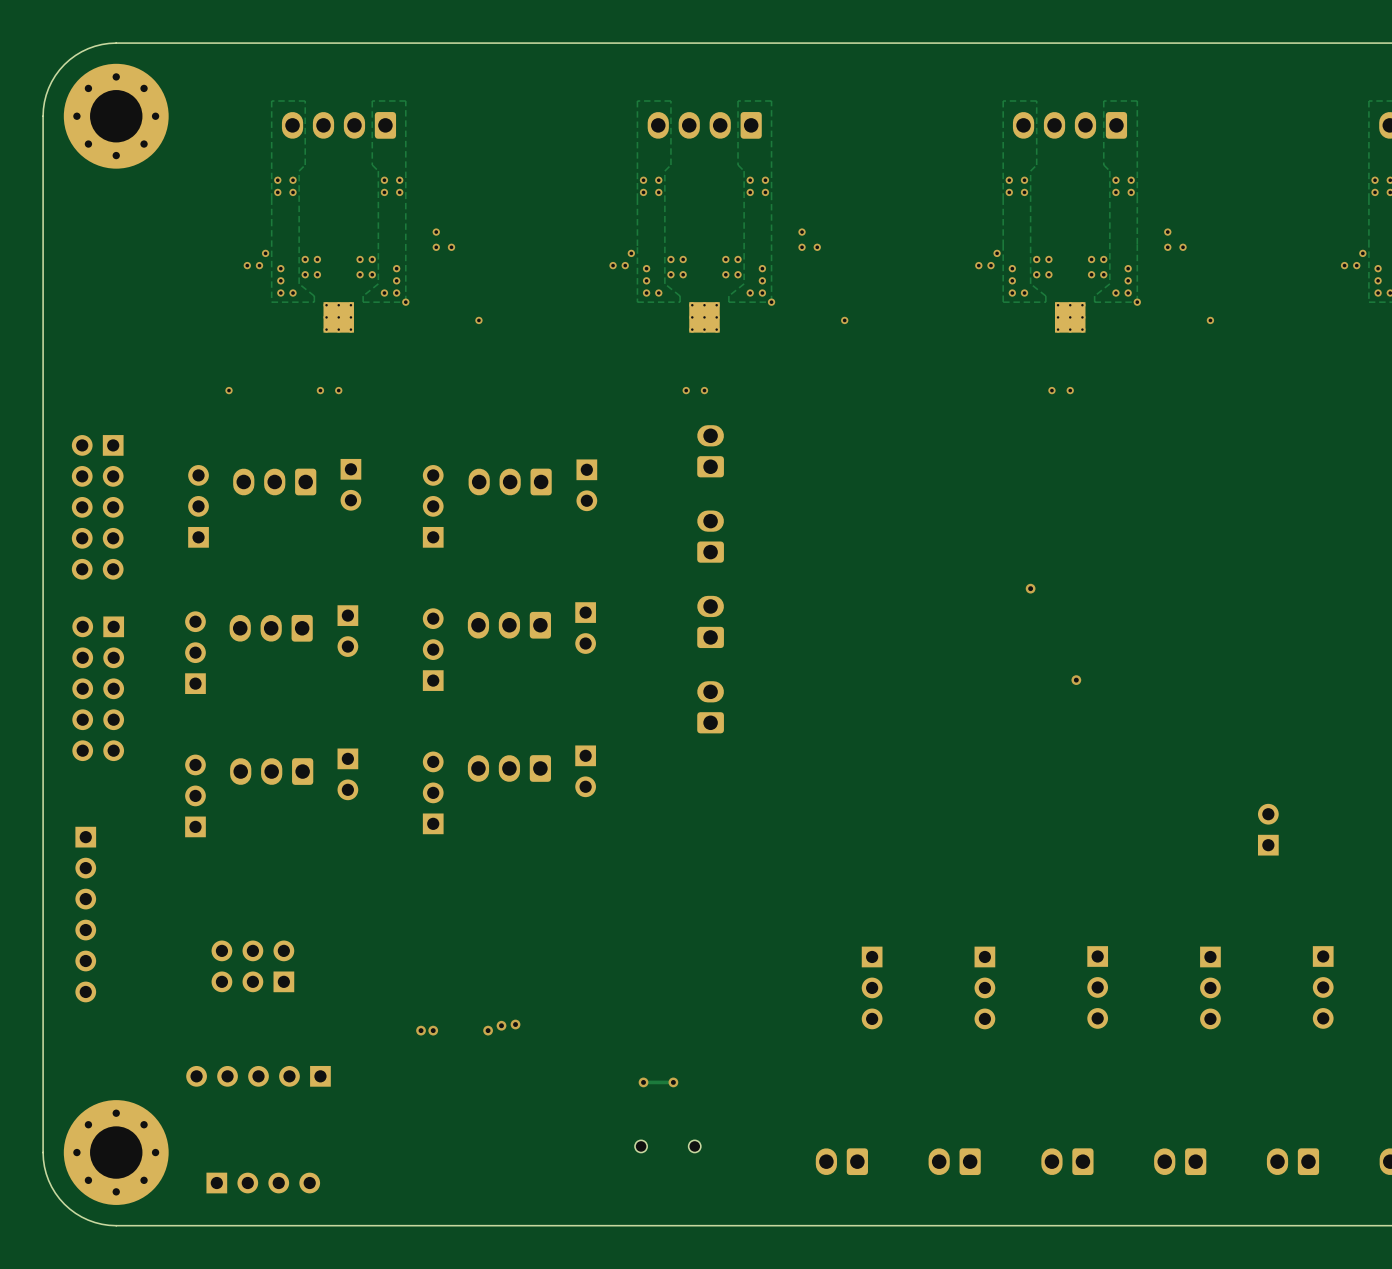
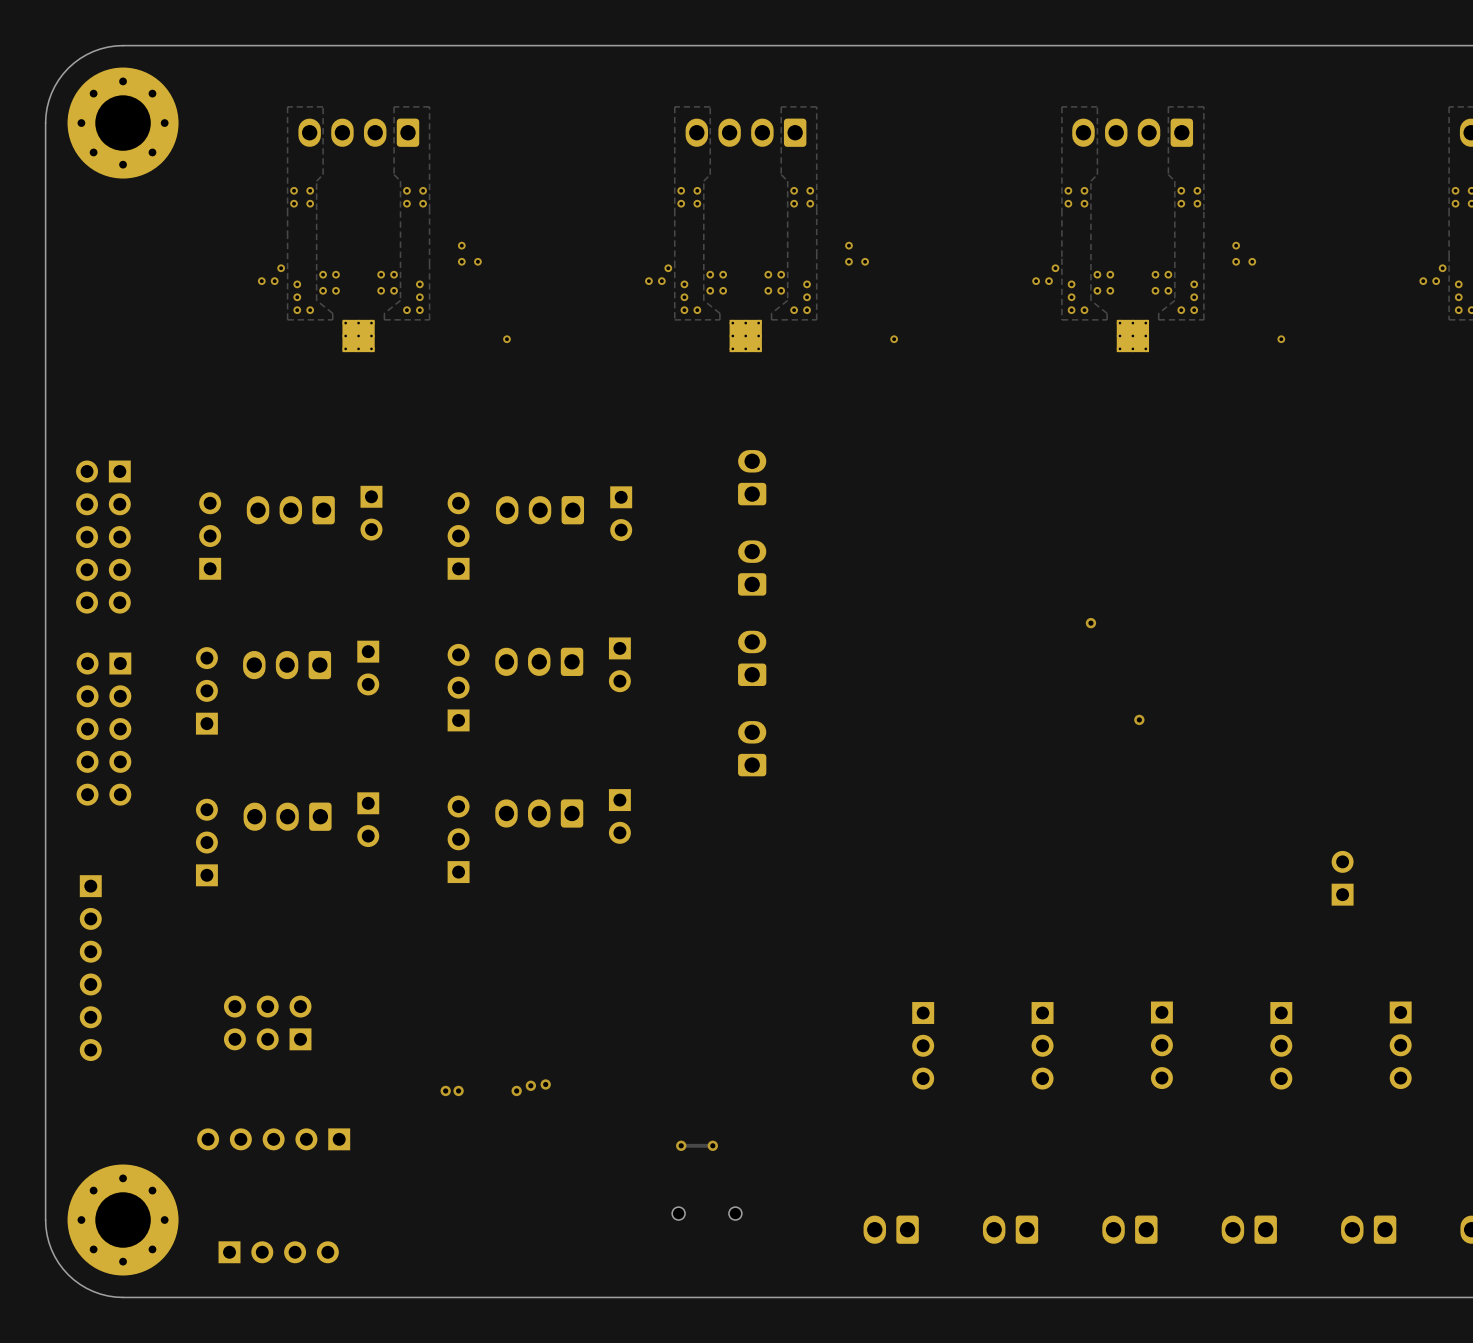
via: (405, 302) -> none
via: (771, 302) -> none
via: (1137, 302) -> none
via: (229, 390) -> none
via: (320, 390) -> none
via: (338, 390) -> none
via: (686, 390) -> none
via: (704, 390) -> none
via: (1051, 390) -> none
via: (1070, 390) -> none

